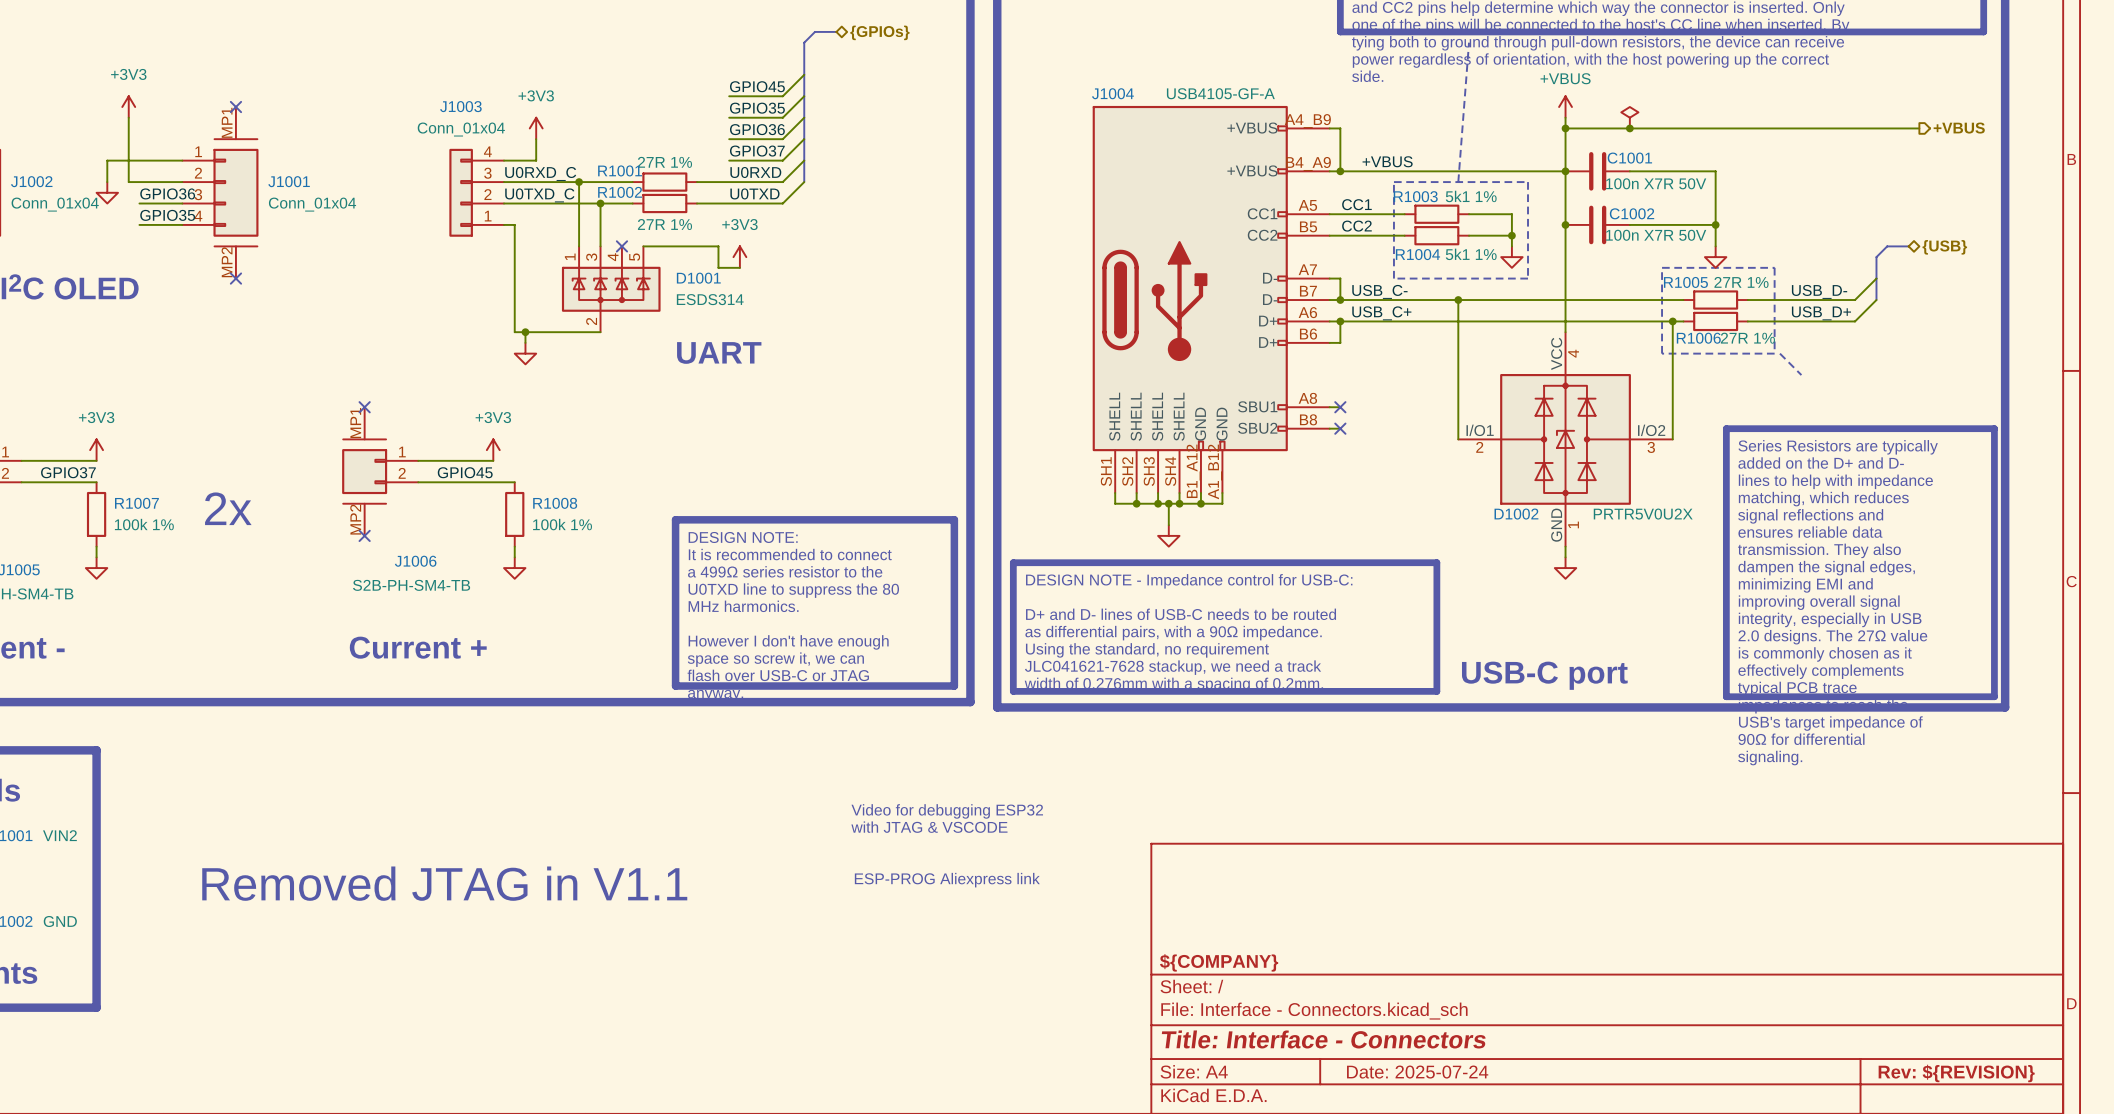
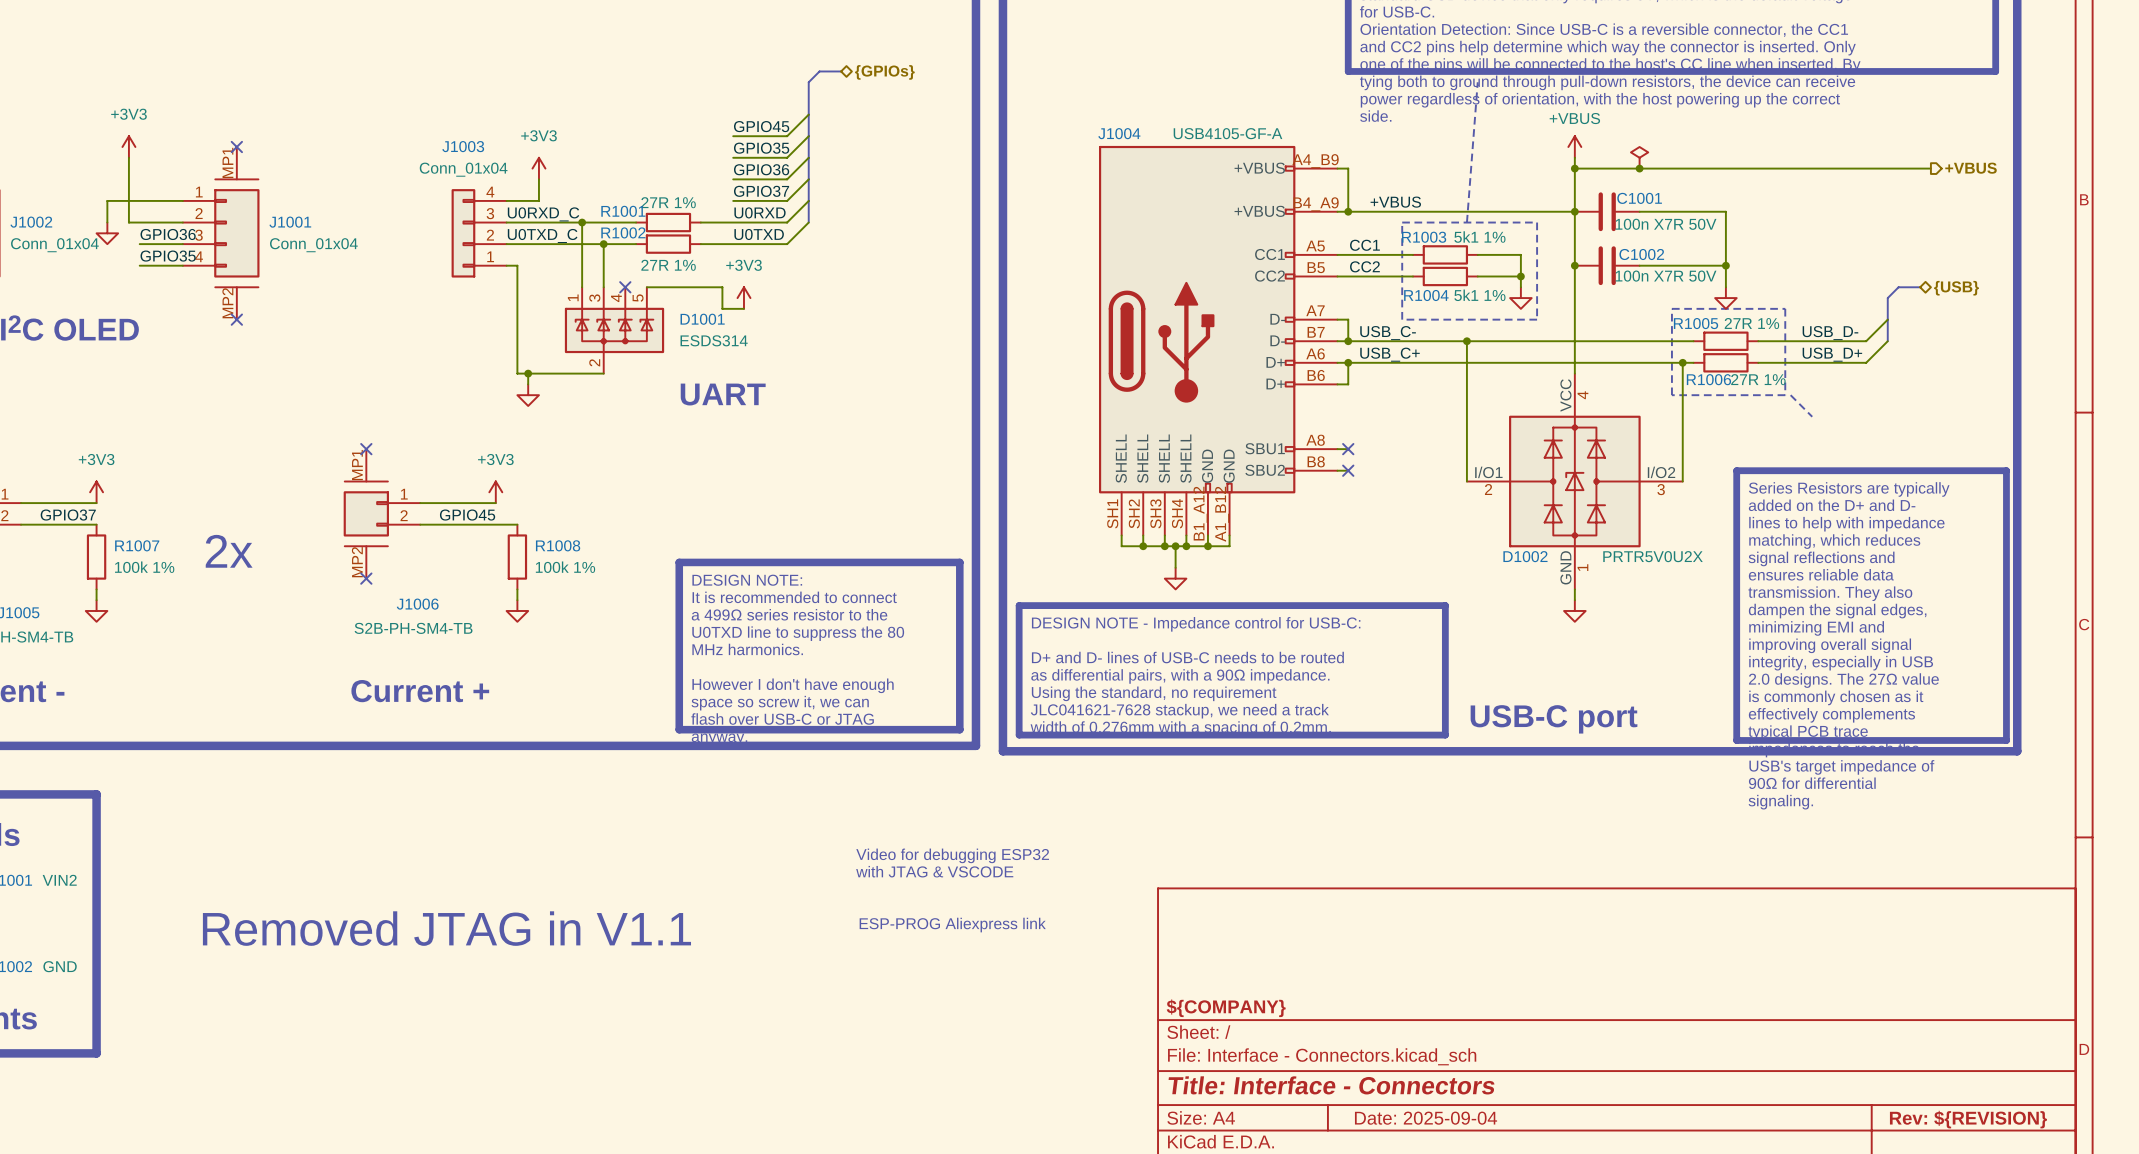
title block: Date: 2025-07-24 (1417, 1072) -> Date: 2025-09-04 (1426, 1118)

